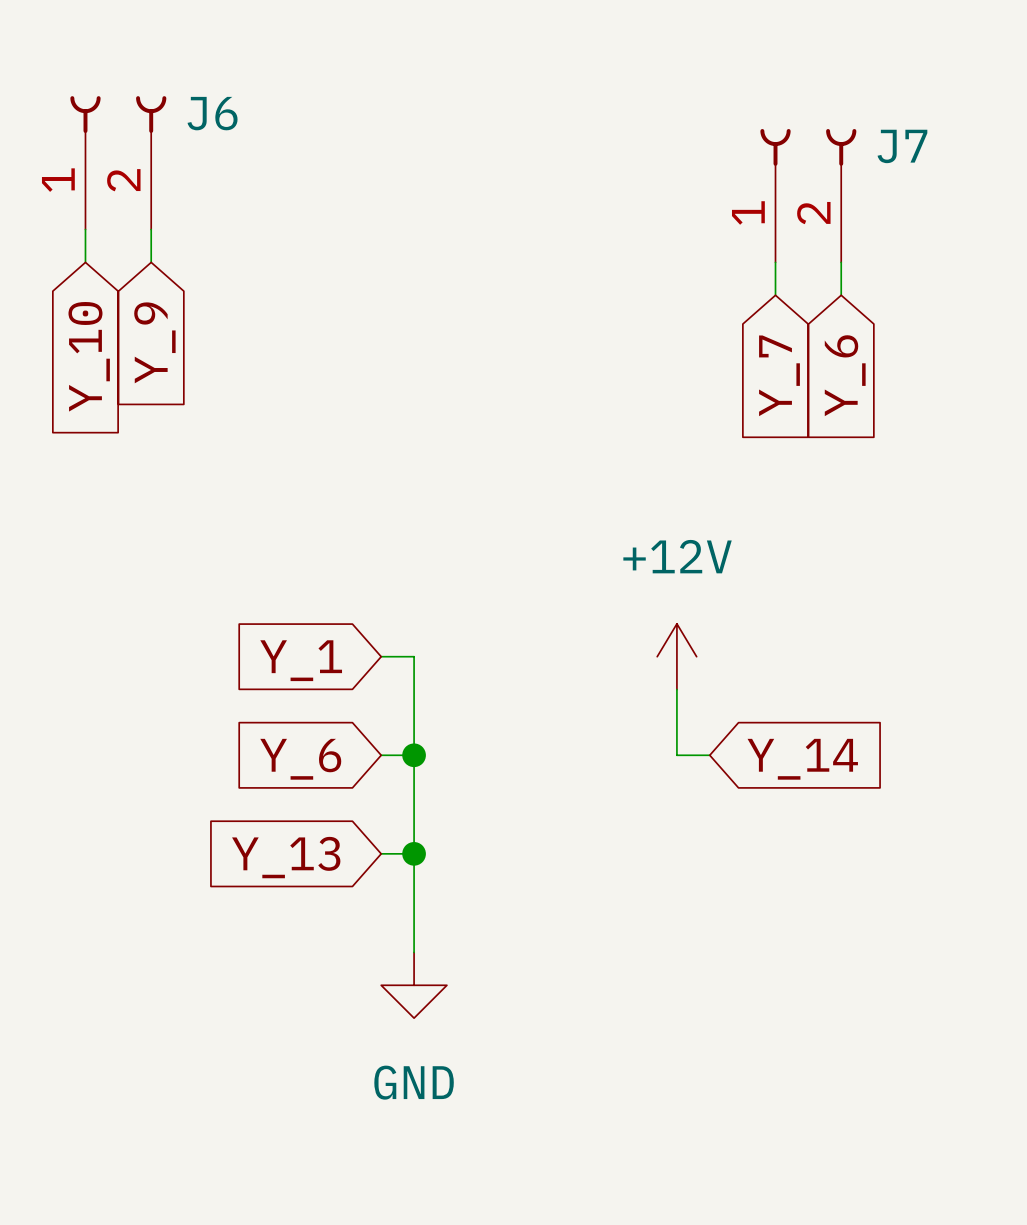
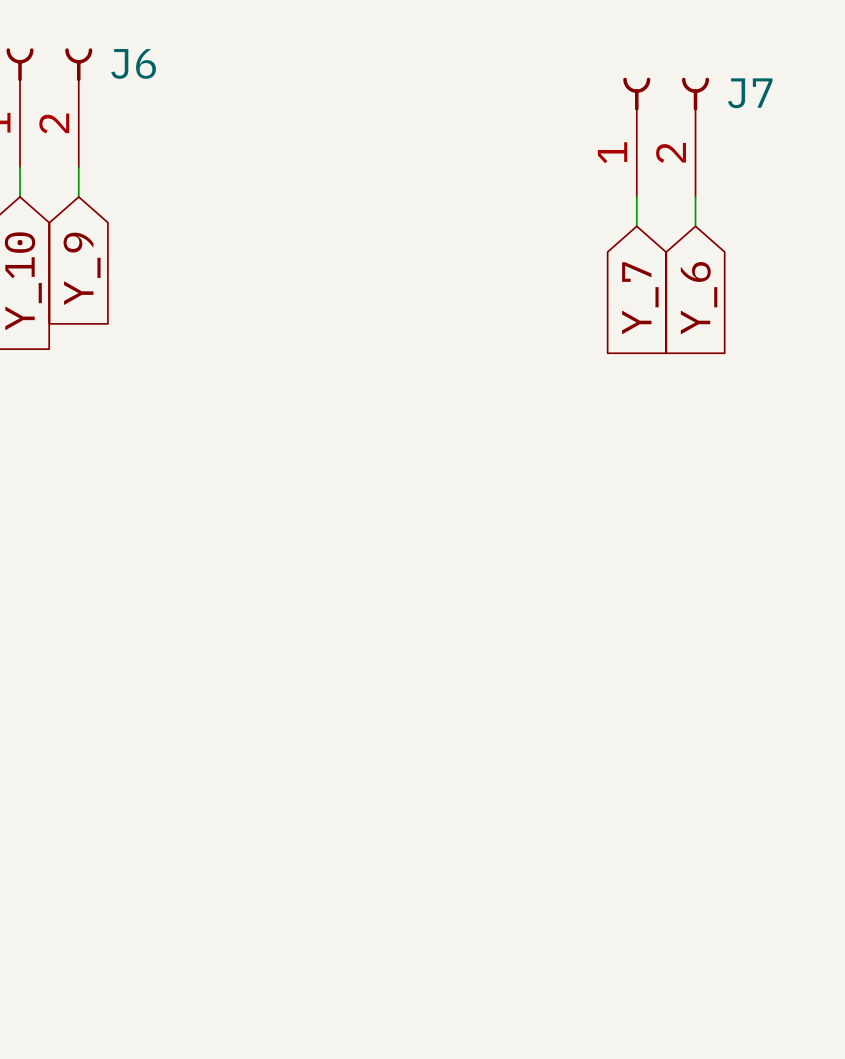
wire: (381, 656) (414, 656) (414, 952) -> none
power symbol: +12V (676, 656) -> none
global label: Y_1 (301, 660) -> none
wire: (676, 689) (676, 755) (709, 755) -> none
wire: (381, 755) (414, 755) -> none
junction: (414, 755) -> none
global label: Y_6 (300, 759) -> none
global label: Y_14 (802, 759) -> none
wire: (381, 853) (414, 853) -> none
junction: (414, 853) -> none
global label: Y_13 (286, 857) -> none
power symbol: GND (414, 985) -> none

